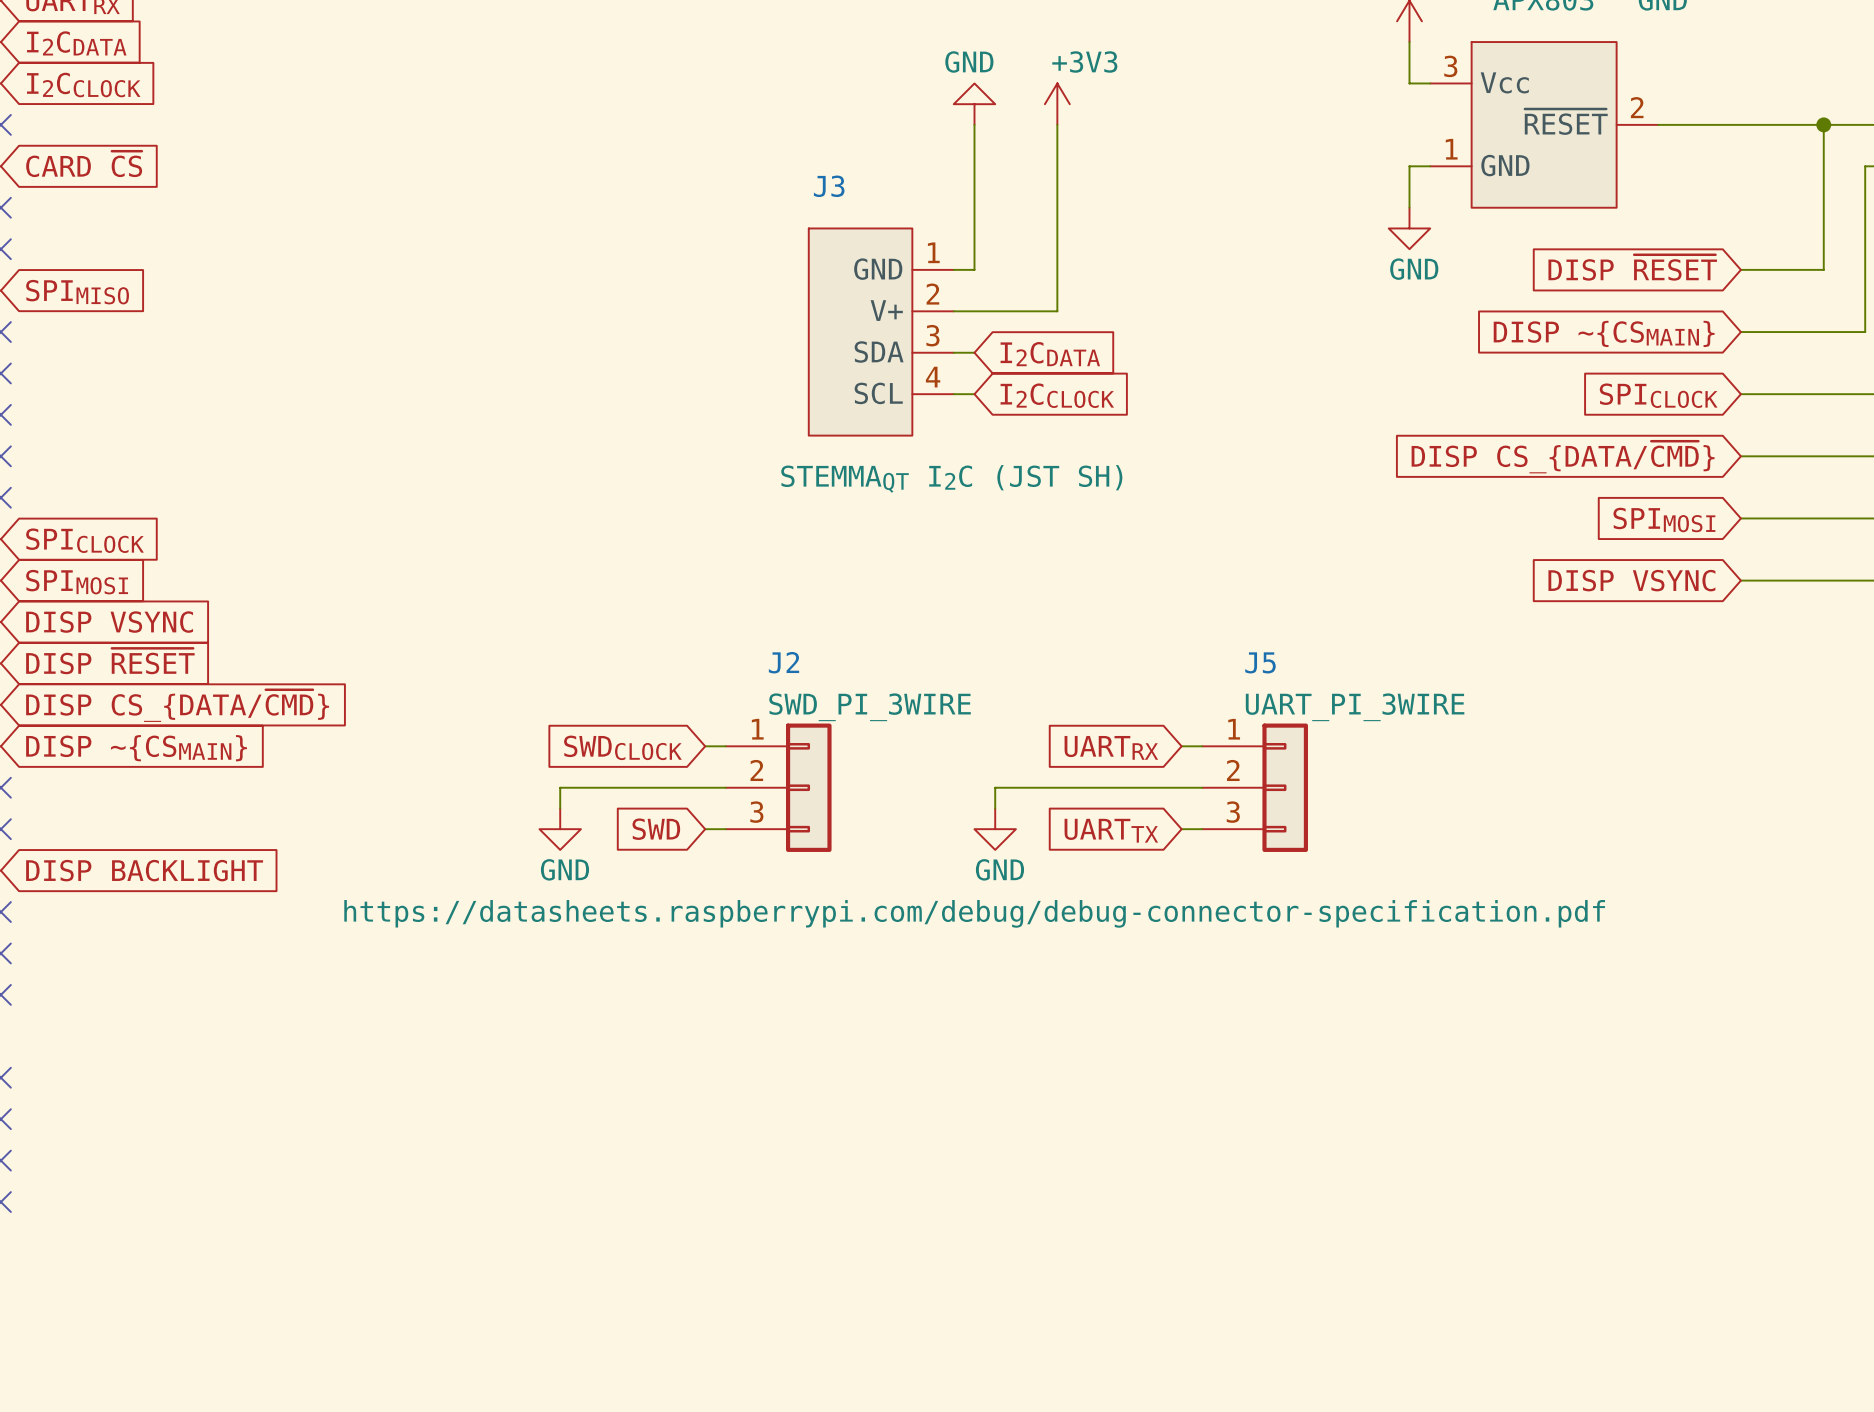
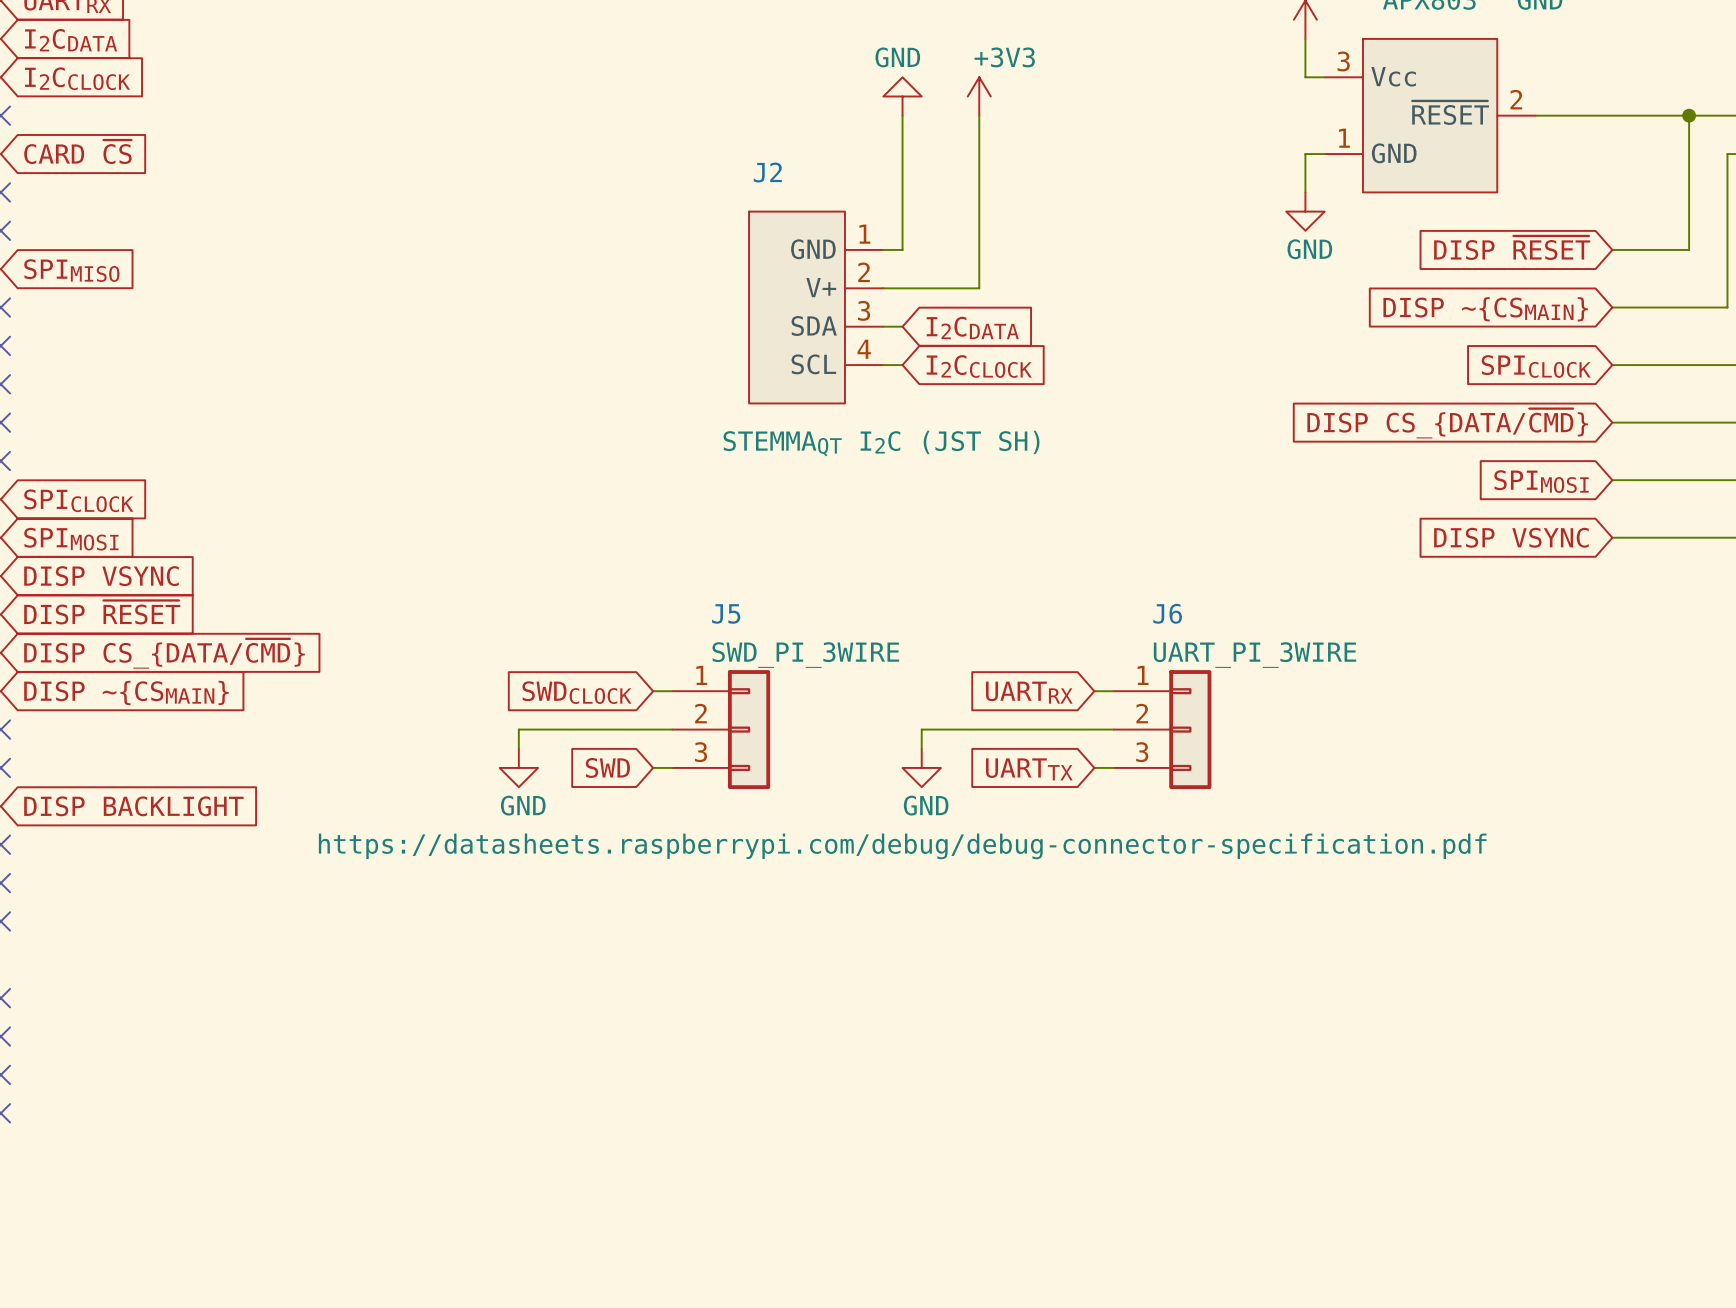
J3 name: J3 (829, 186) -> J2 (767, 172)
J2 name: J2 (784, 662) -> J5 (726, 613)
J5 name: J5 (1260, 662) -> J6 (1167, 613)

